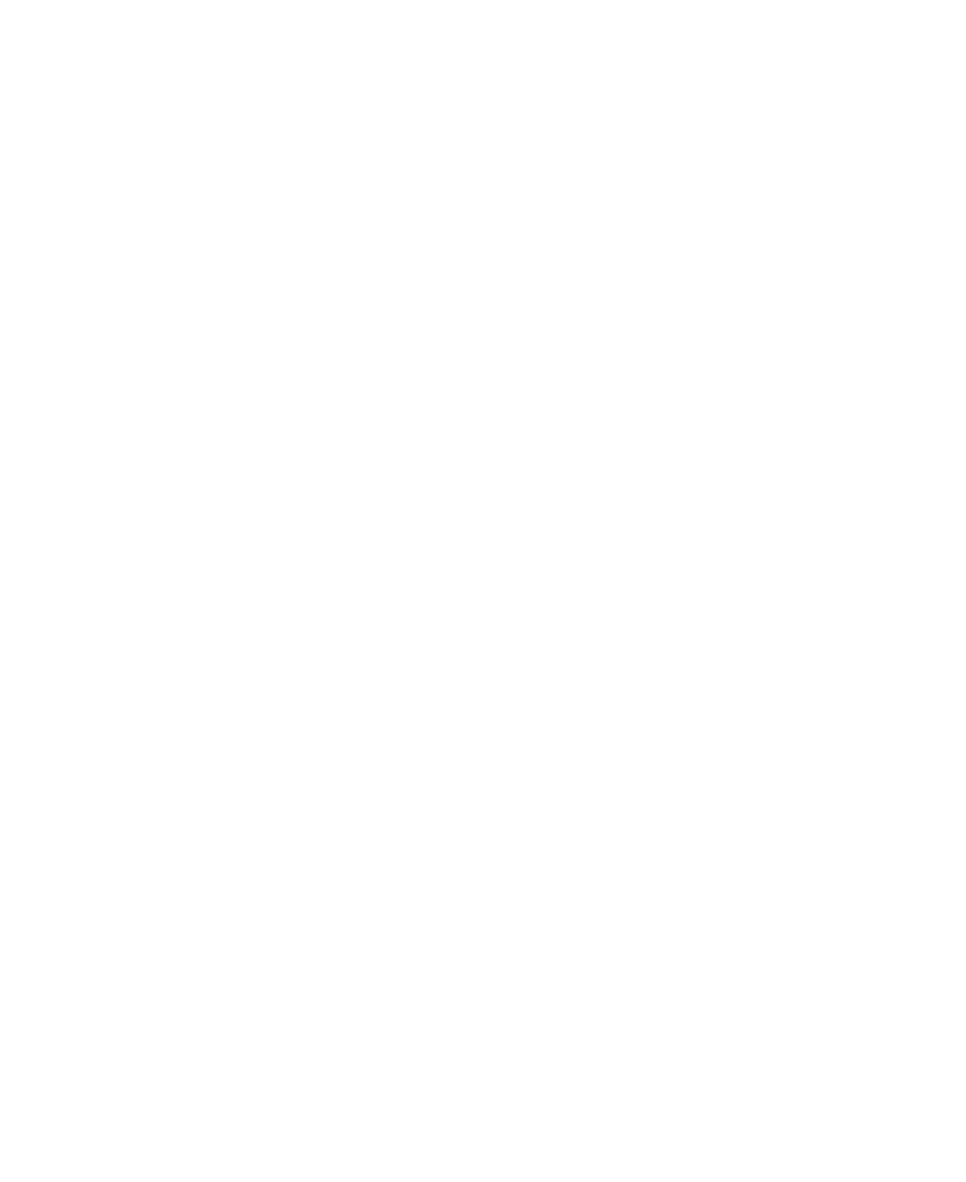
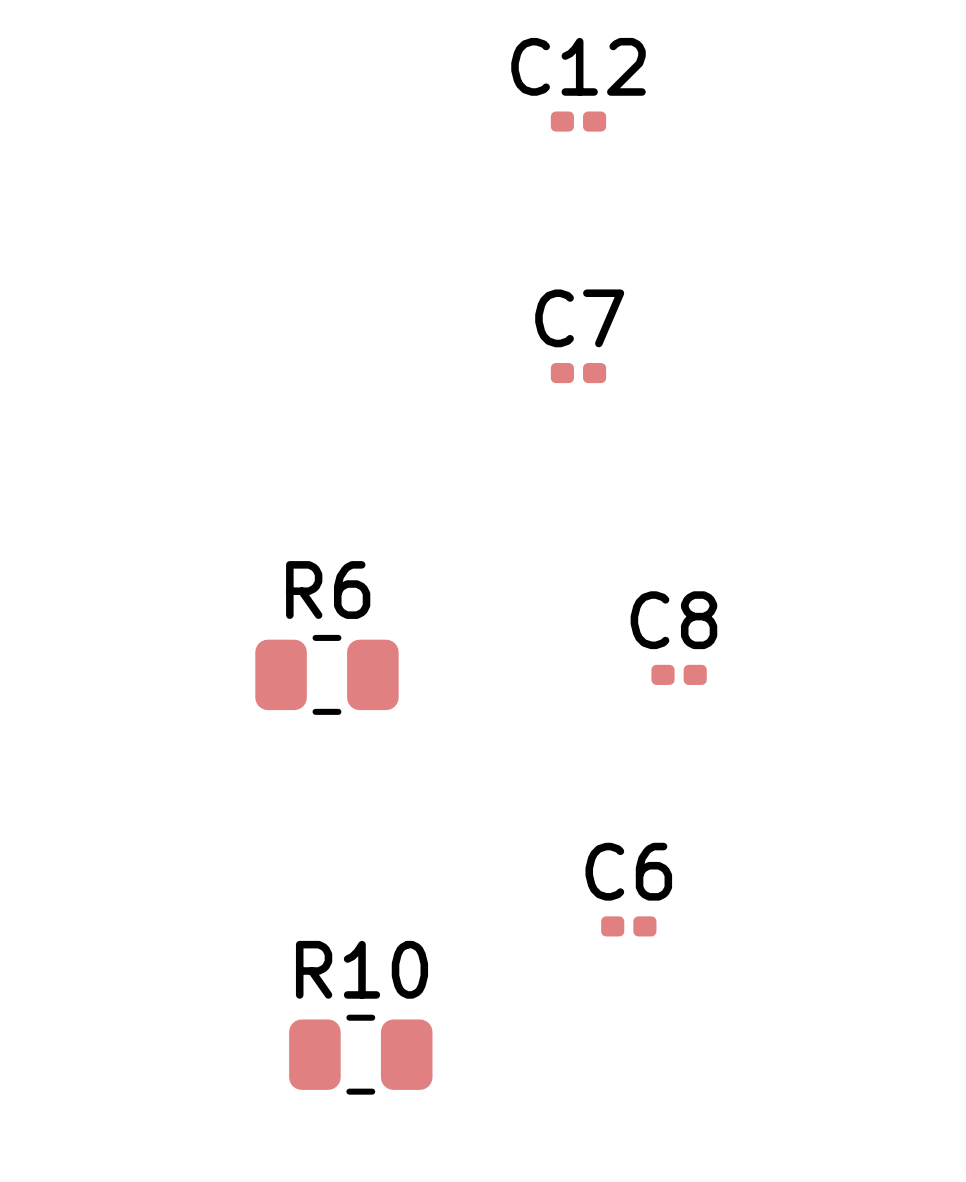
C12: none -> (578, 121)
C7: none -> (578, 373)
R6: none -> (326, 674)
C8: none -> (679, 674)
C6: none -> (628, 926)
R10: none -> (360, 1054)

